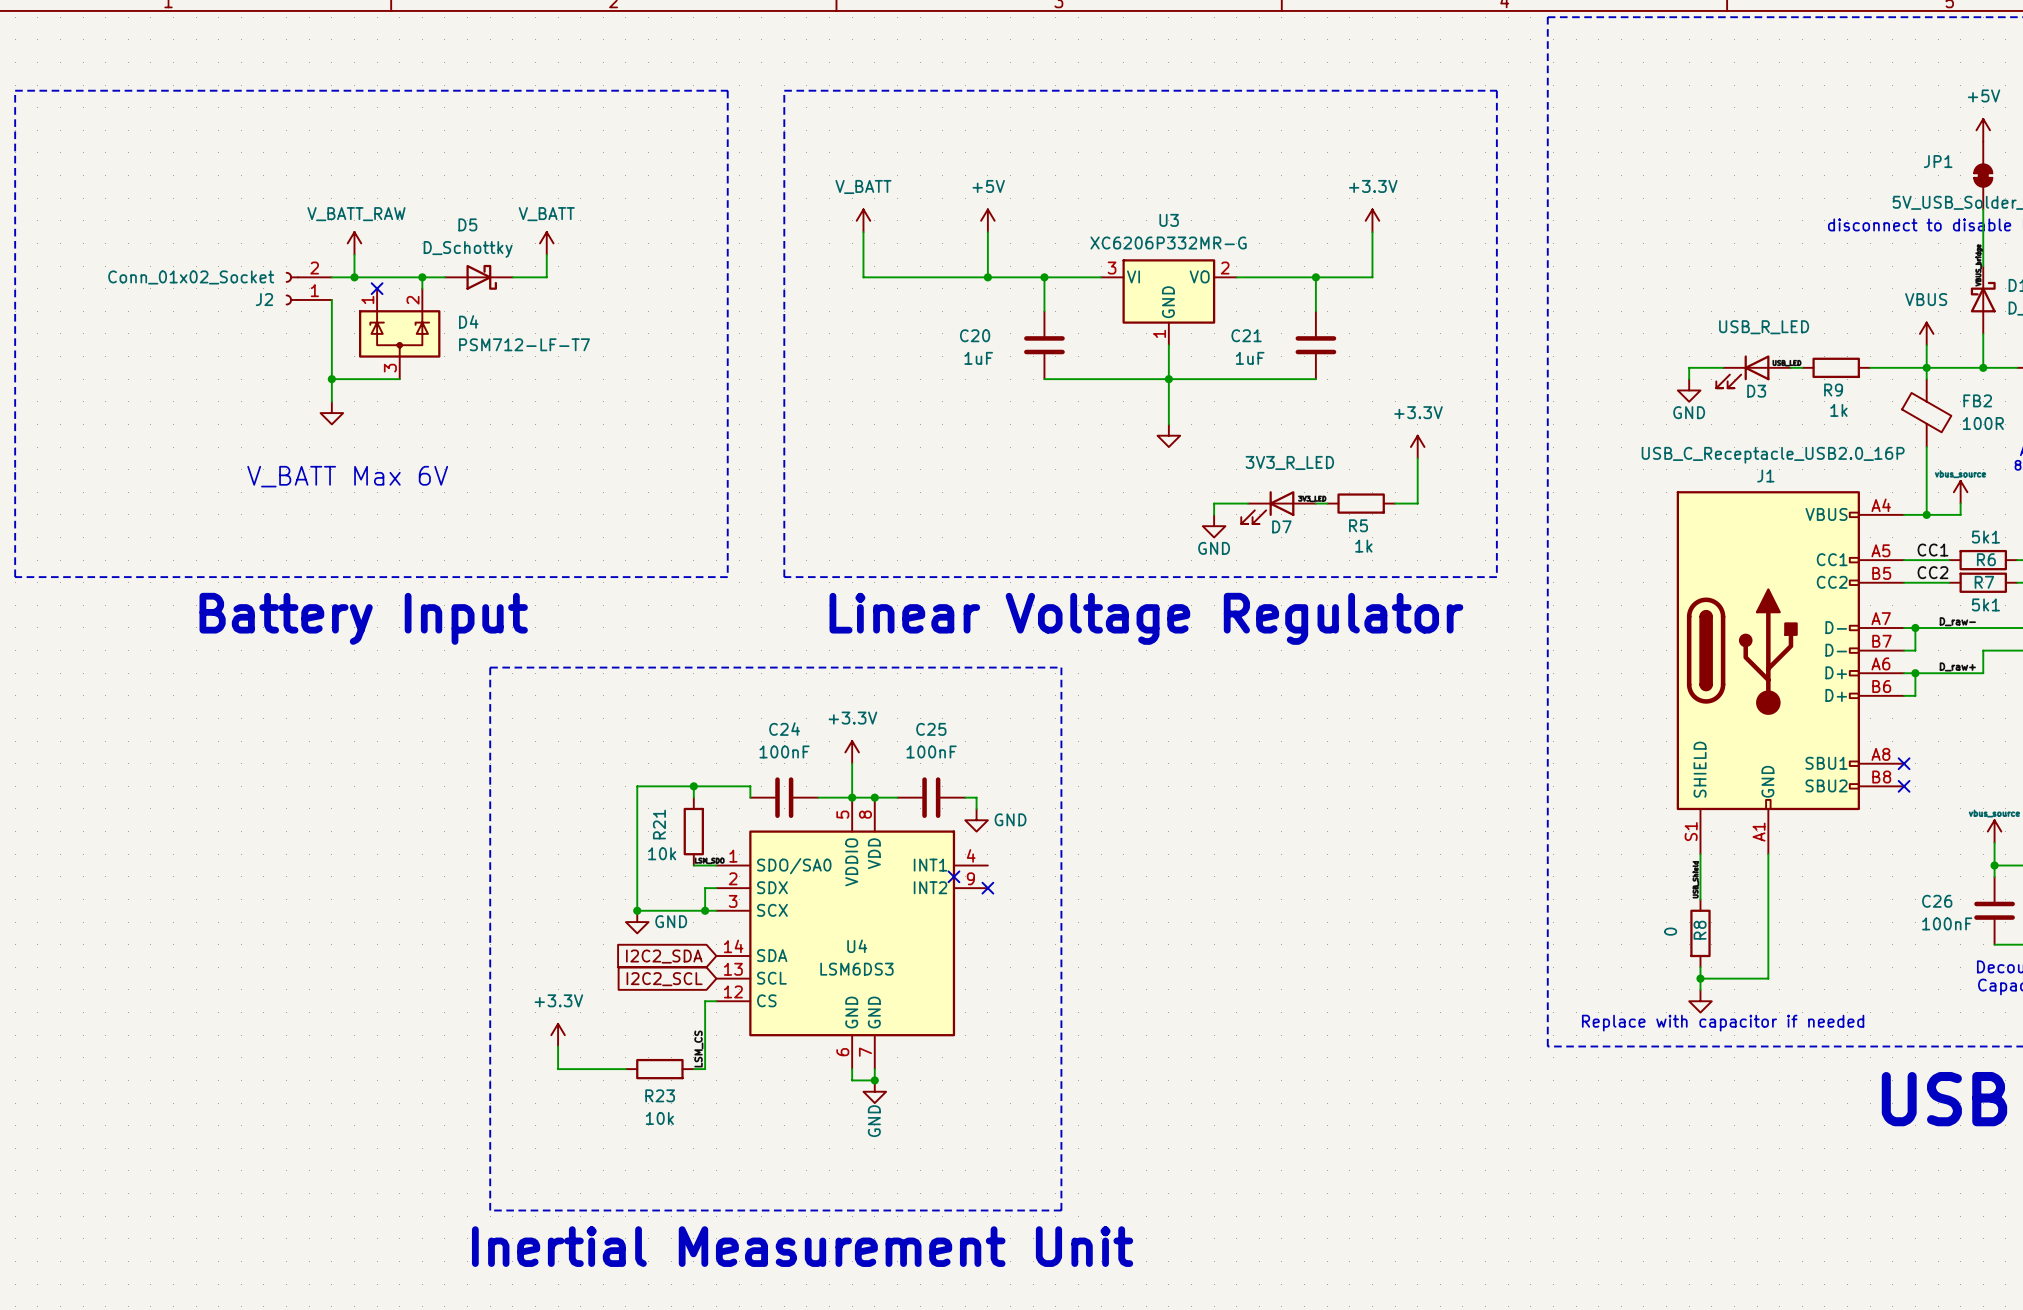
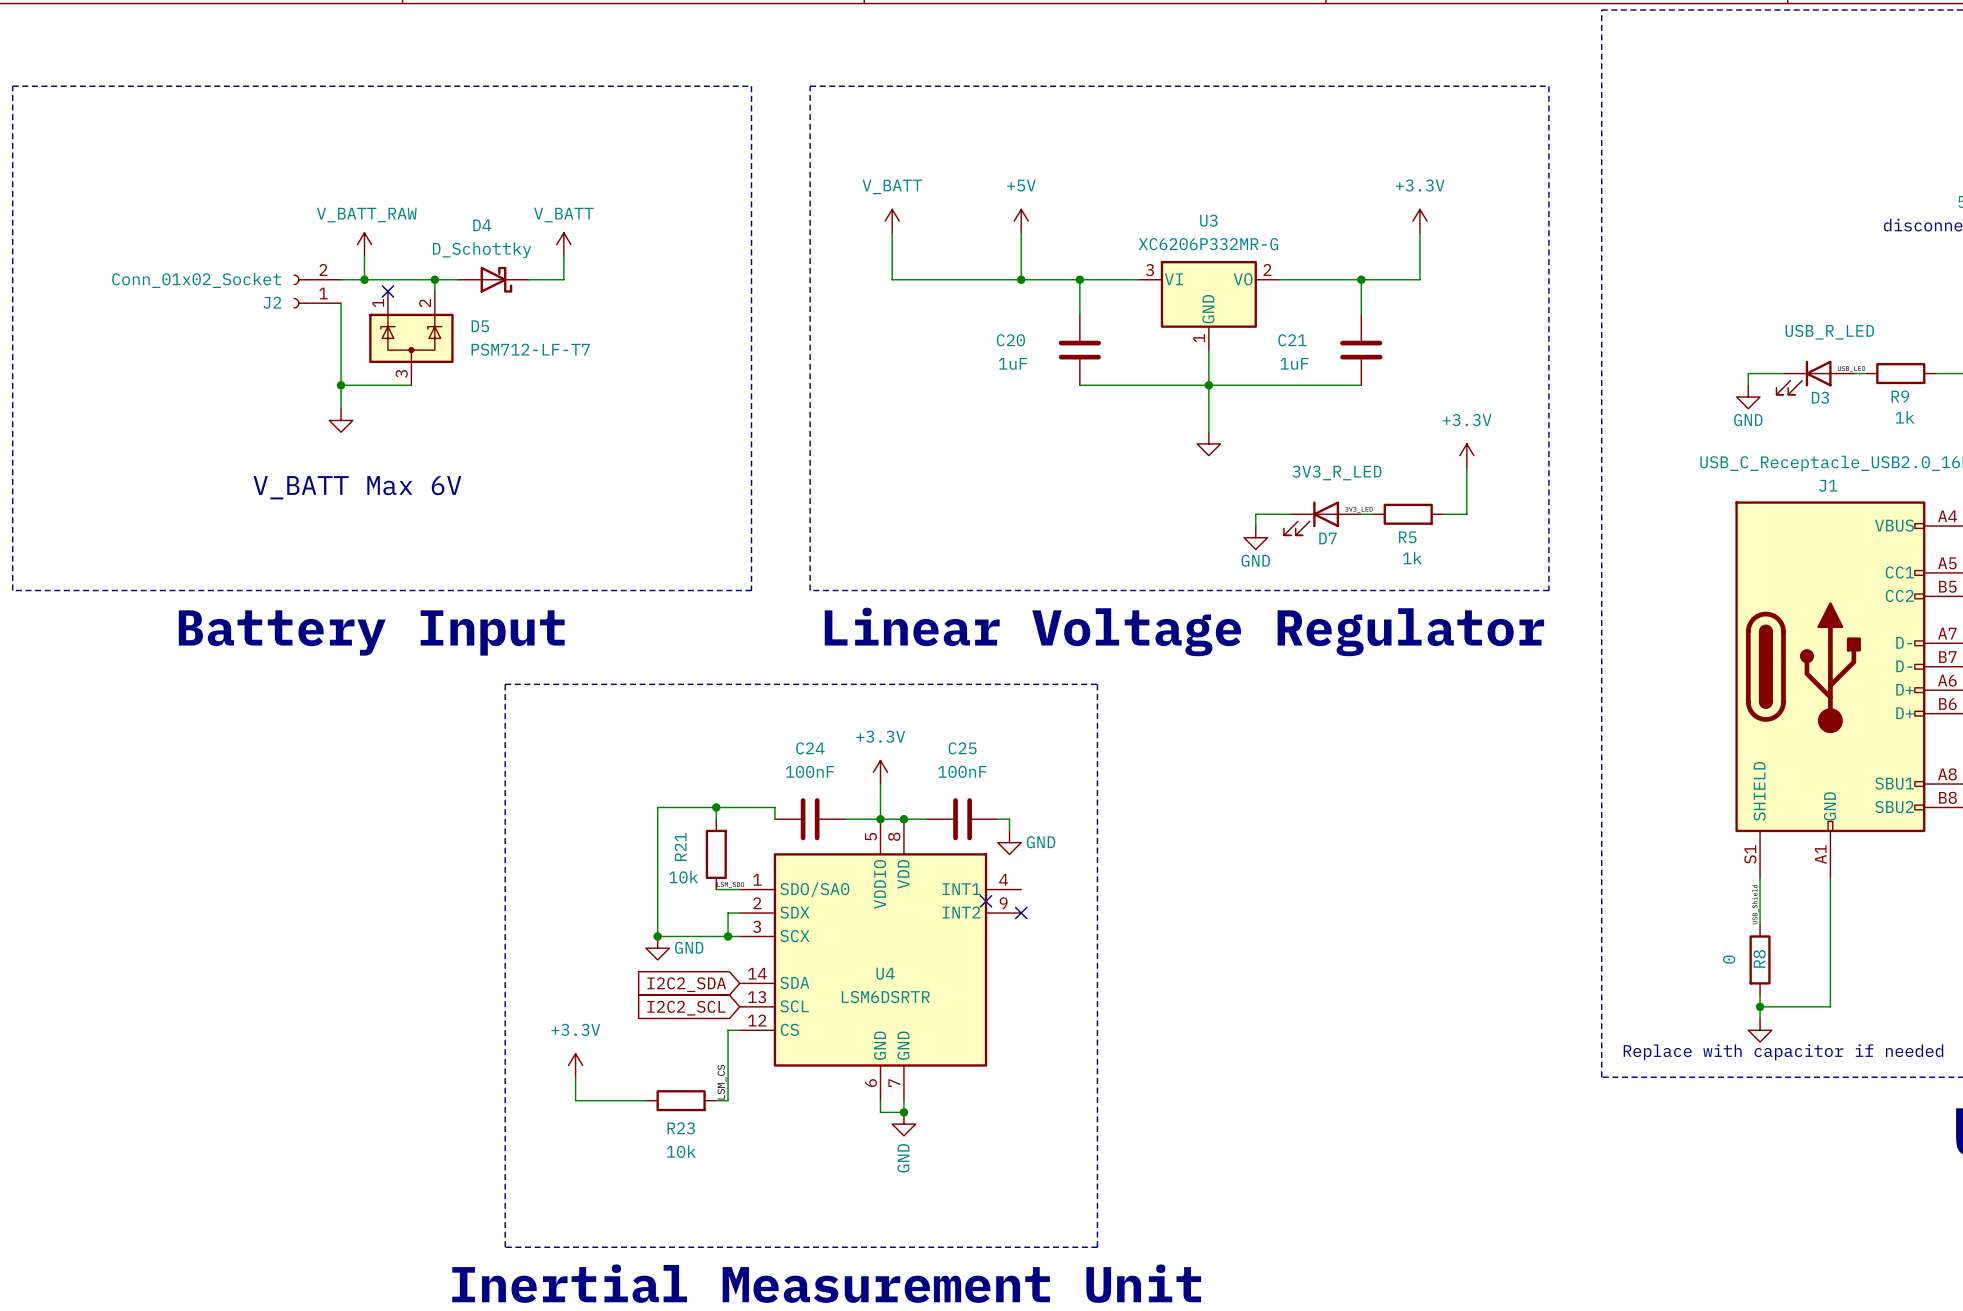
D5 name: D5 (467, 224) -> D4 (482, 225)
D4 name: D4 (468, 321) -> D5 (480, 326)
U4 value: LSM6DS3 (856, 969) -> LSM6DSRTR (885, 997)

